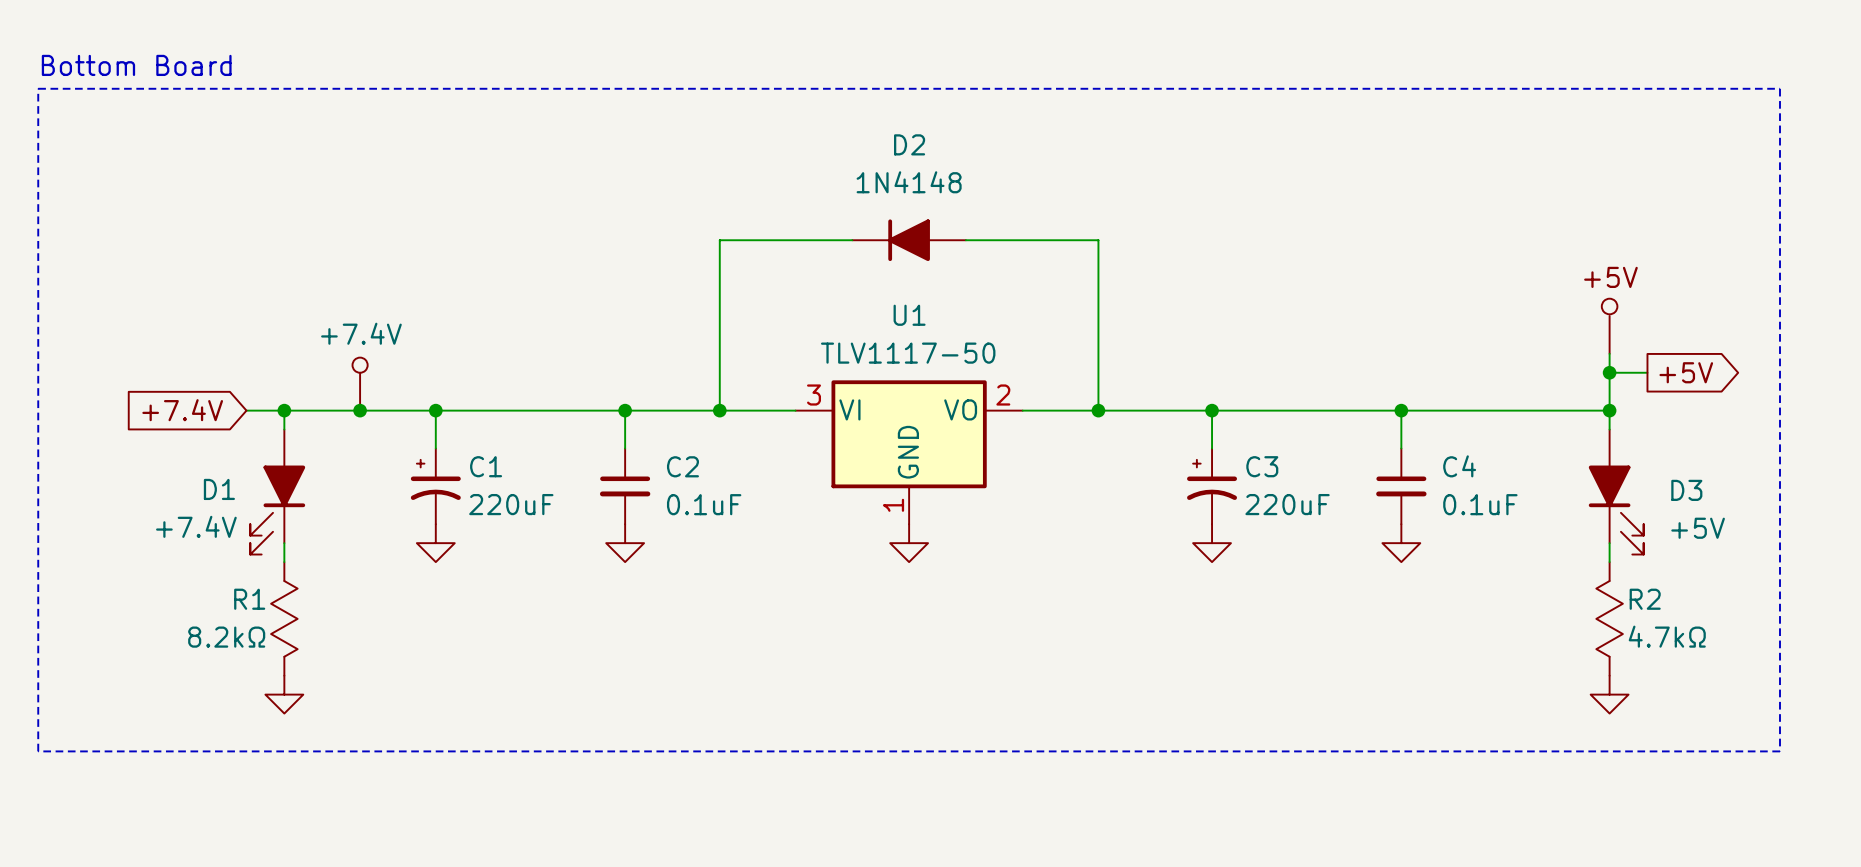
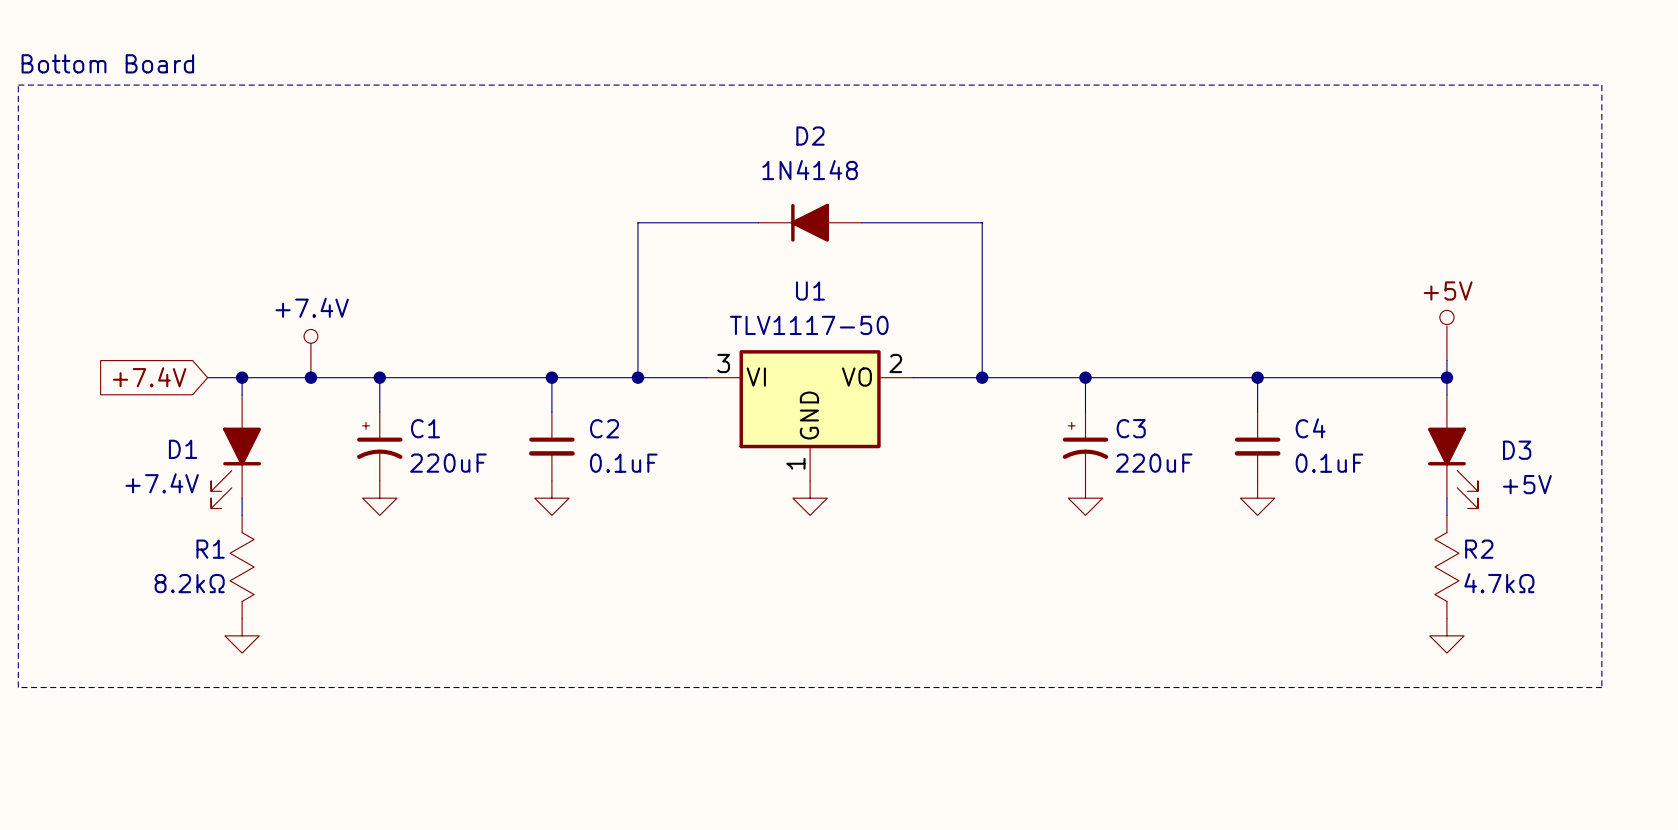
power symbol position: (1609, 326) -> (1446, 335)
wire: (1609, 372) (1647, 372) -> none
junction: (1609, 372) -> none
global label: +5V (1686, 372) -> none

